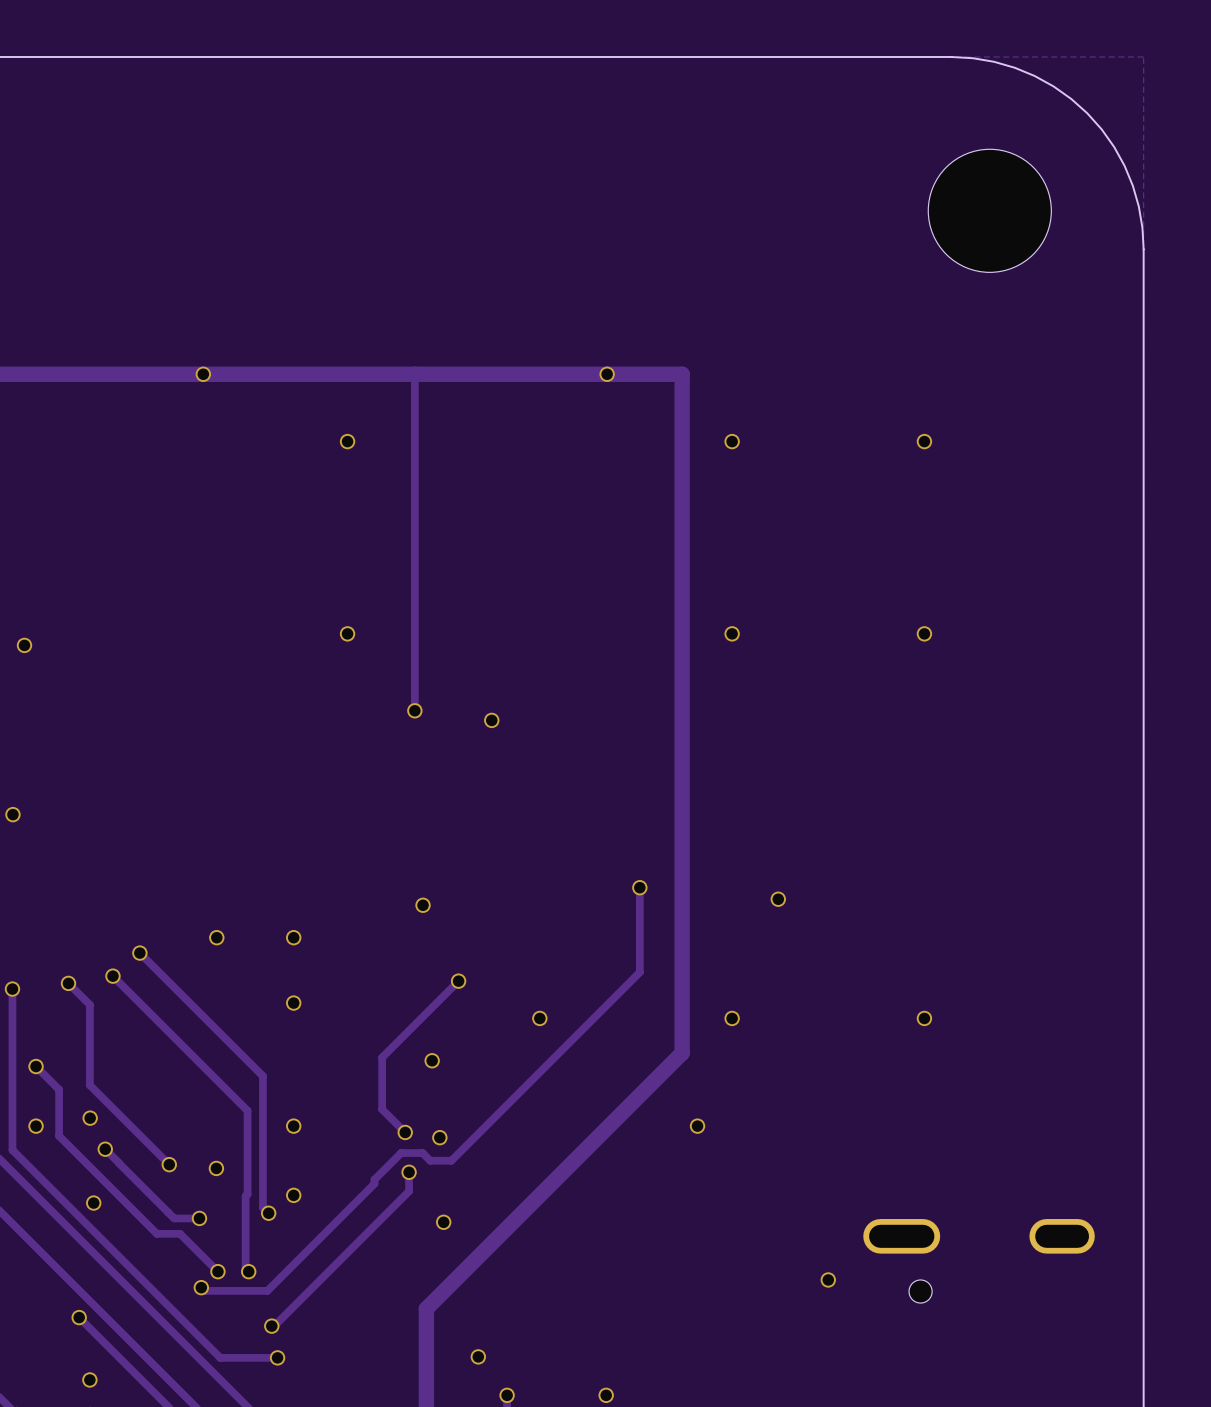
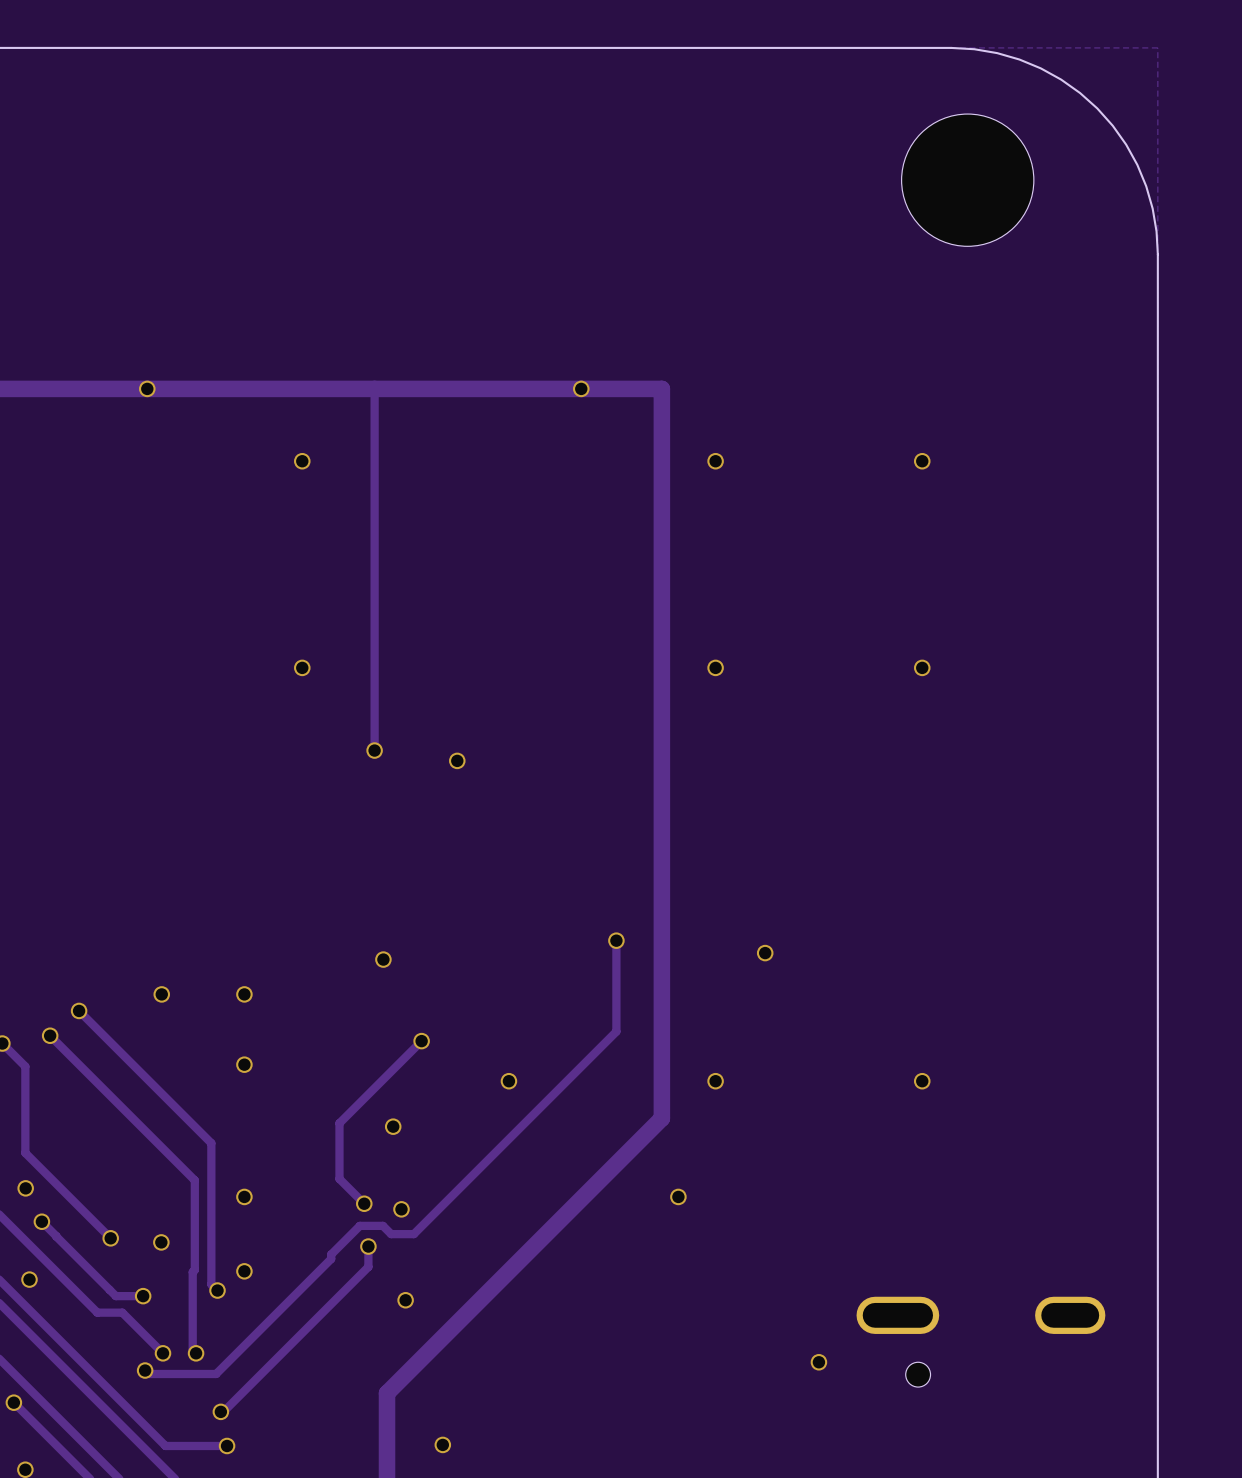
part position: (989, 210) -> (967, 180)

